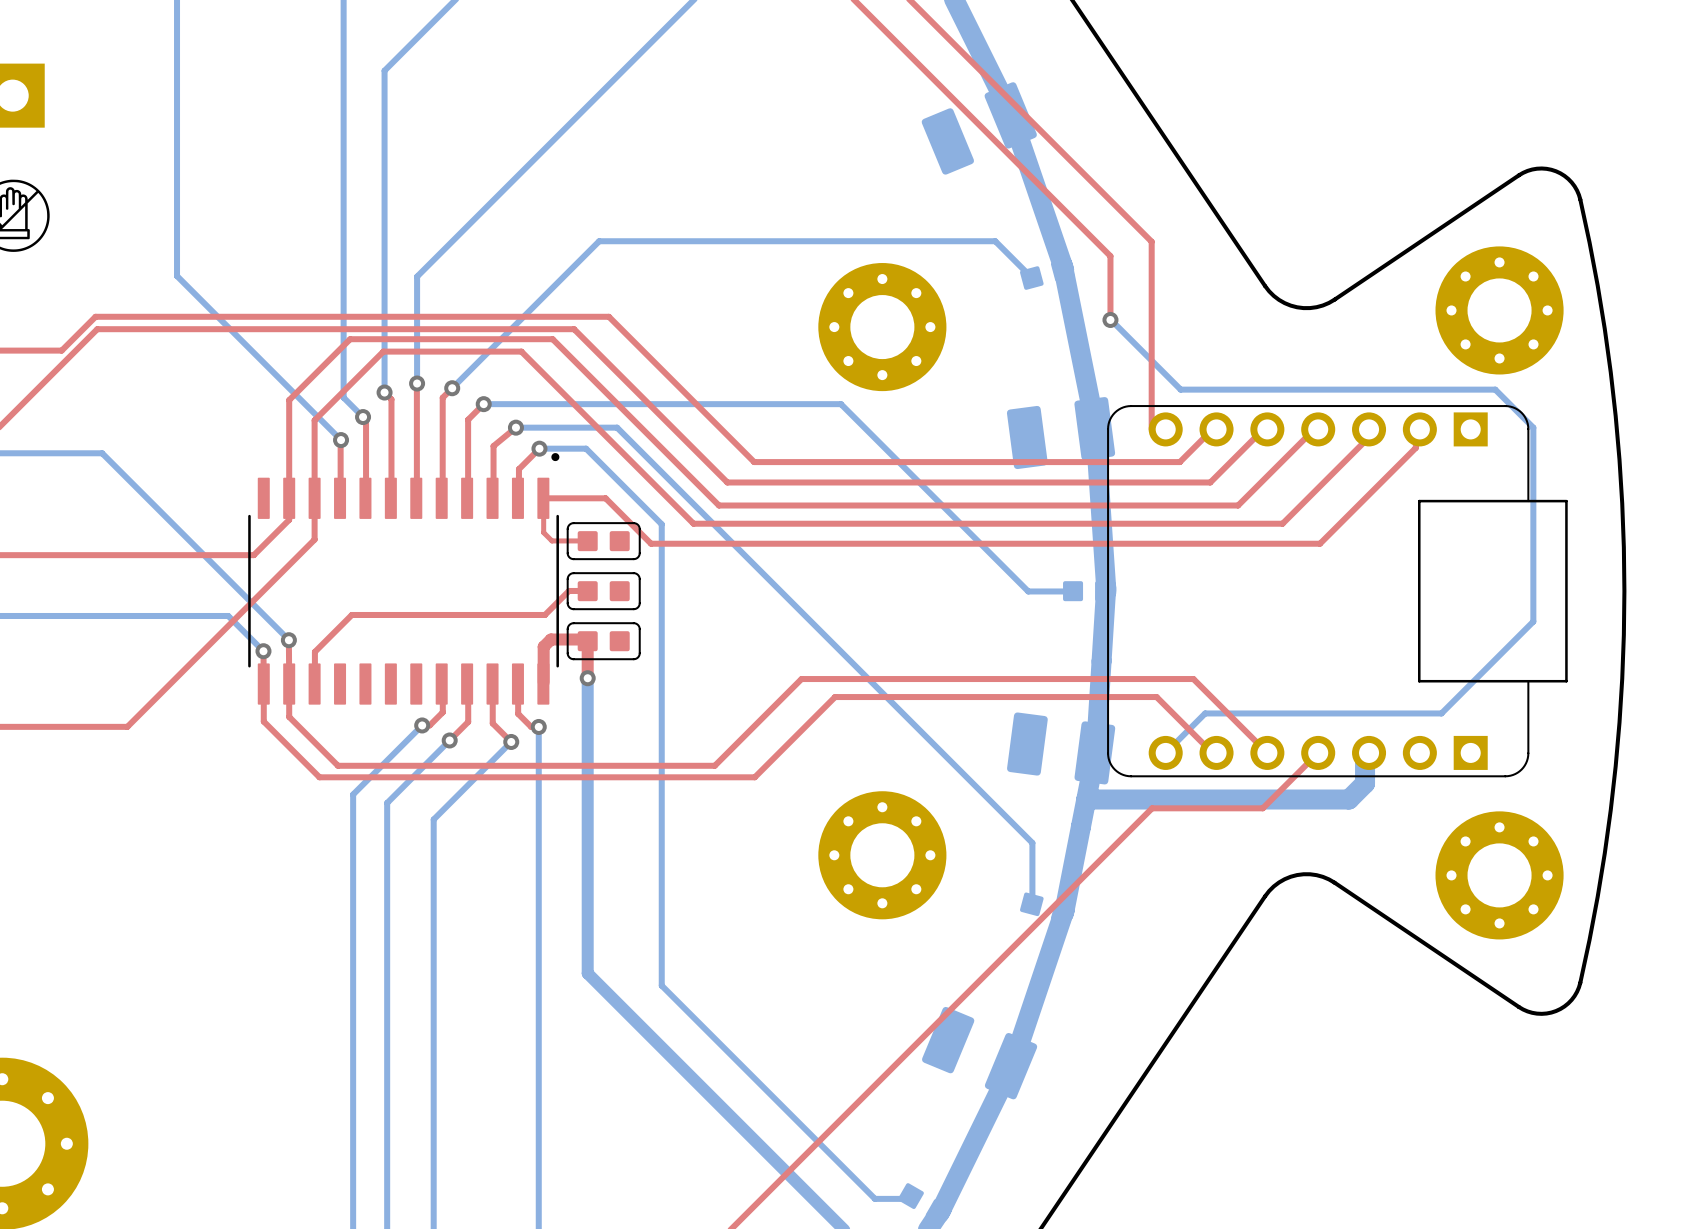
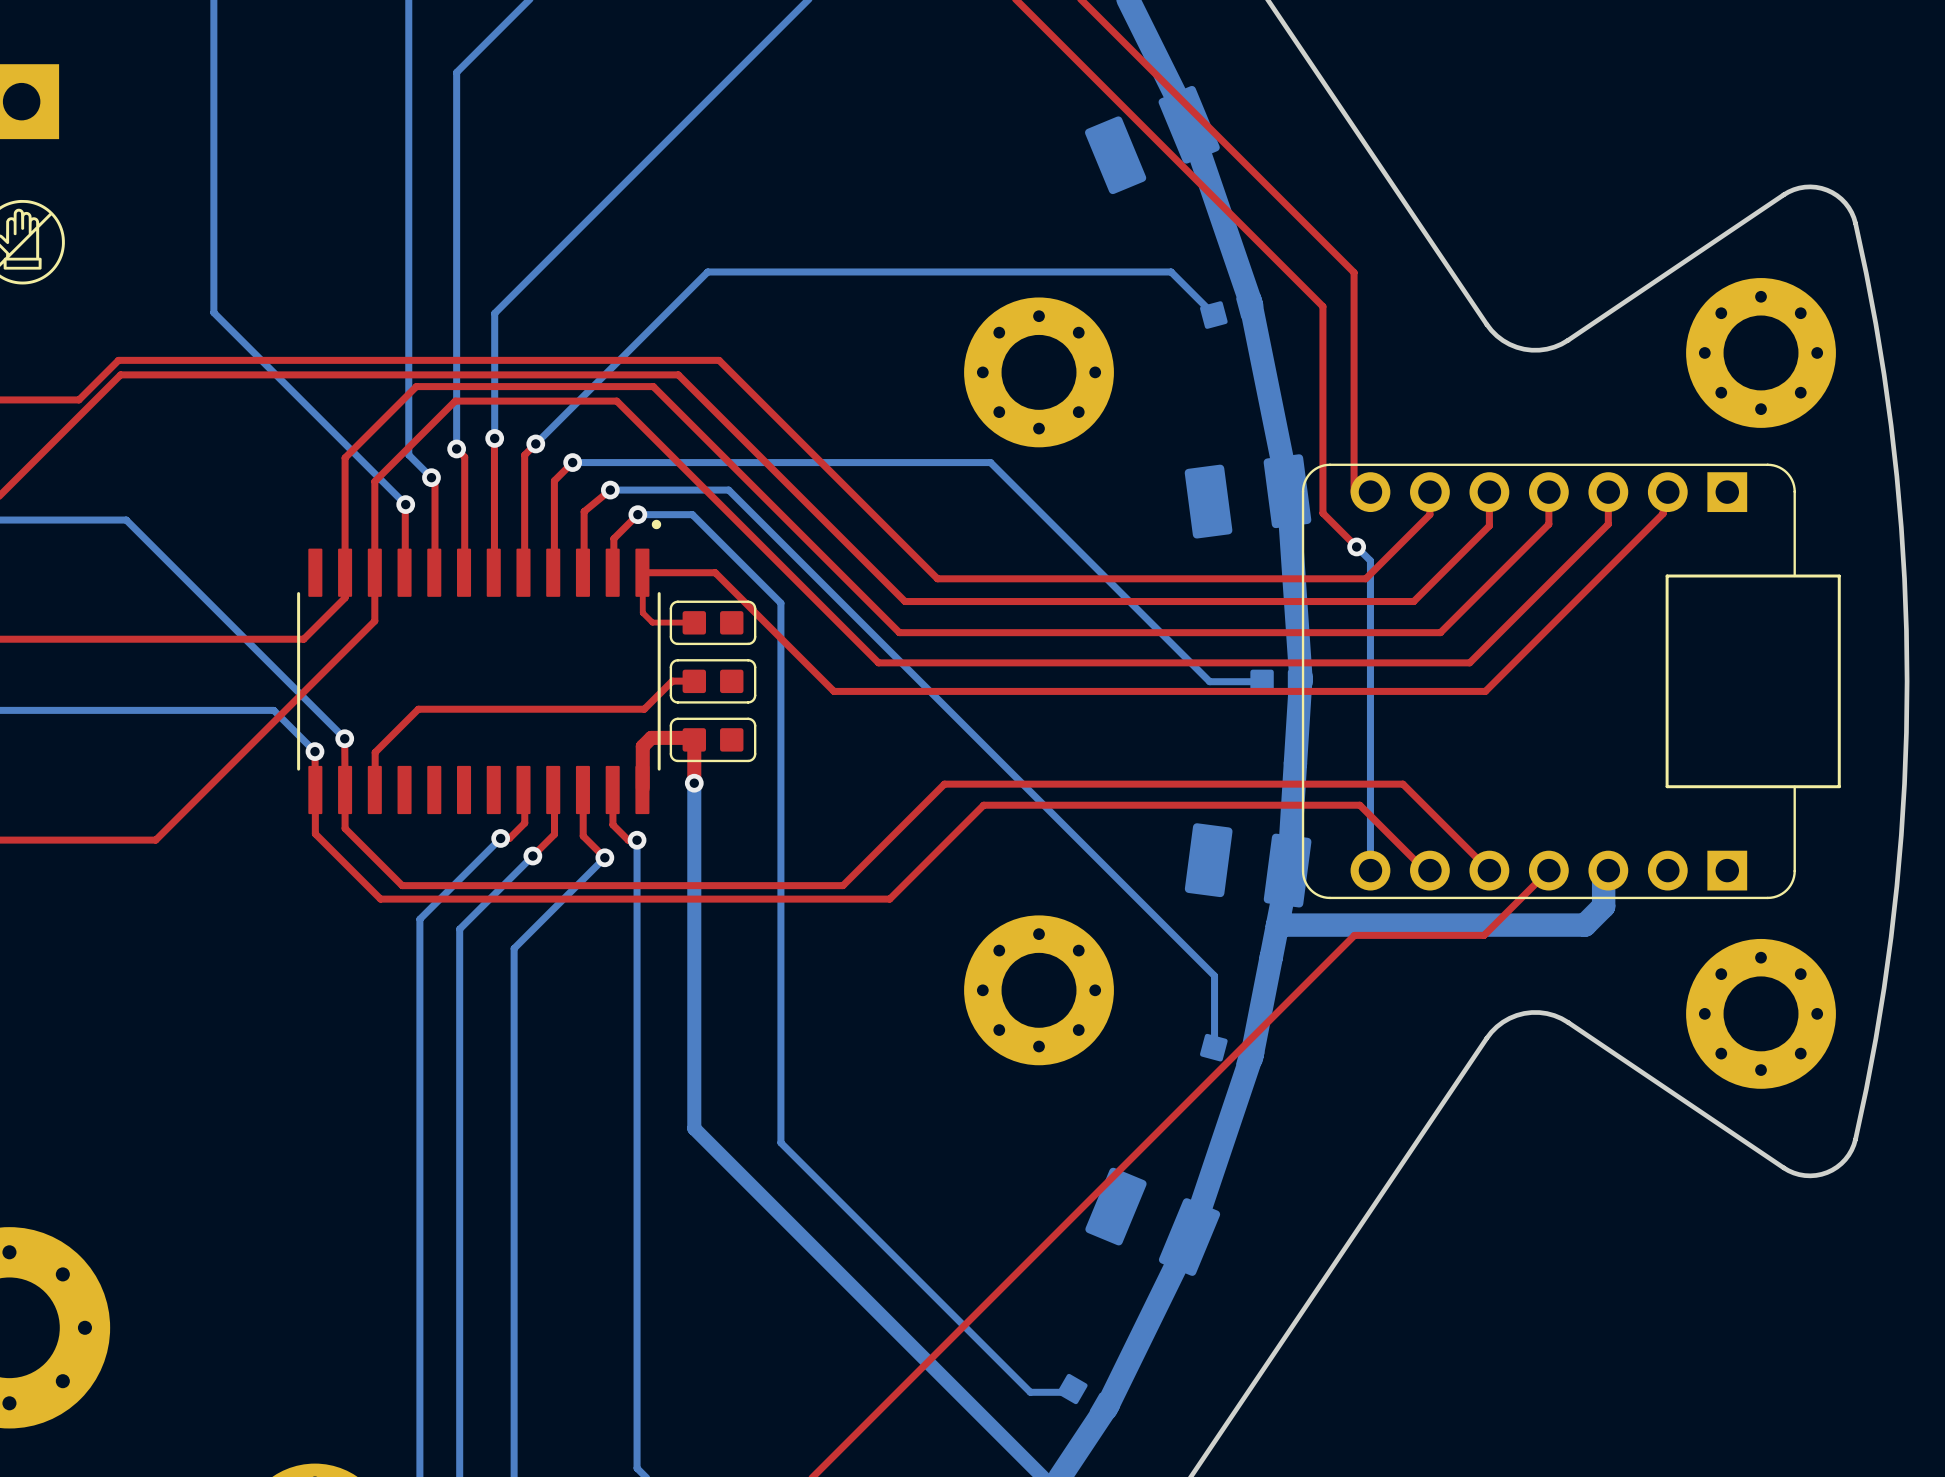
top track: (1110, 256) (1110, 319) -> (1305, 289) (1322, 306) (1322, 513) (1356, 546)
bottom track: (1110, 319) (1180, 389) (1495, 389) (1533, 427) (1533, 621) (1441, 713) (1205, 713) (1165, 752) -> (1356, 546) (1370, 560) (1370, 870)
via: (1110, 319) -> none
top track: (1212, 429) (1179, 462) (754, 462) -> (1429, 492) (1429, 514) (1365, 578) (937, 578) (889, 530)
top track: (1263, 429) (1210, 482) (727, 482) -> (1489, 492) (1489, 525) (1413, 601) (905, 601) (857, 554)
top track: (1314, 429) (1238, 505) (718, 505) -> (1548, 492) (1548, 524) (1440, 632) (899, 632) (847, 581)
top track: (1365, 429) (1365, 441) (1282, 523) (693, 523) -> (1608, 492) (1608, 524) (1469, 662) (878, 662) (818, 602)
via: none -> (1356, 546)
top track: (651, 543) (1320, 543) -> (768, 625) (833, 691) (1485, 691) (1550, 625)

